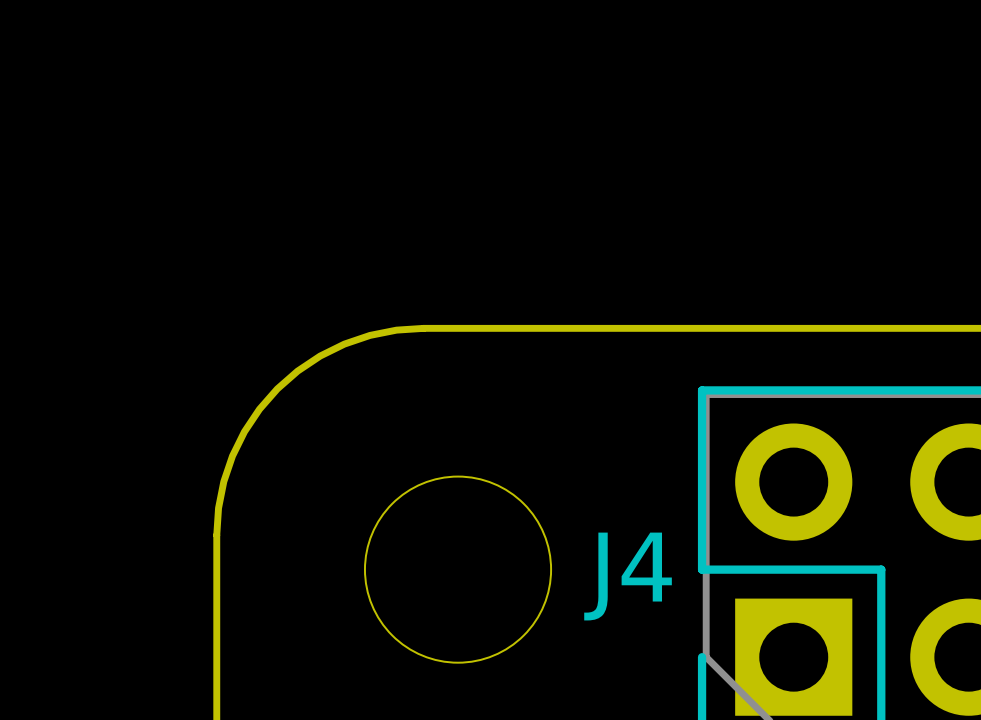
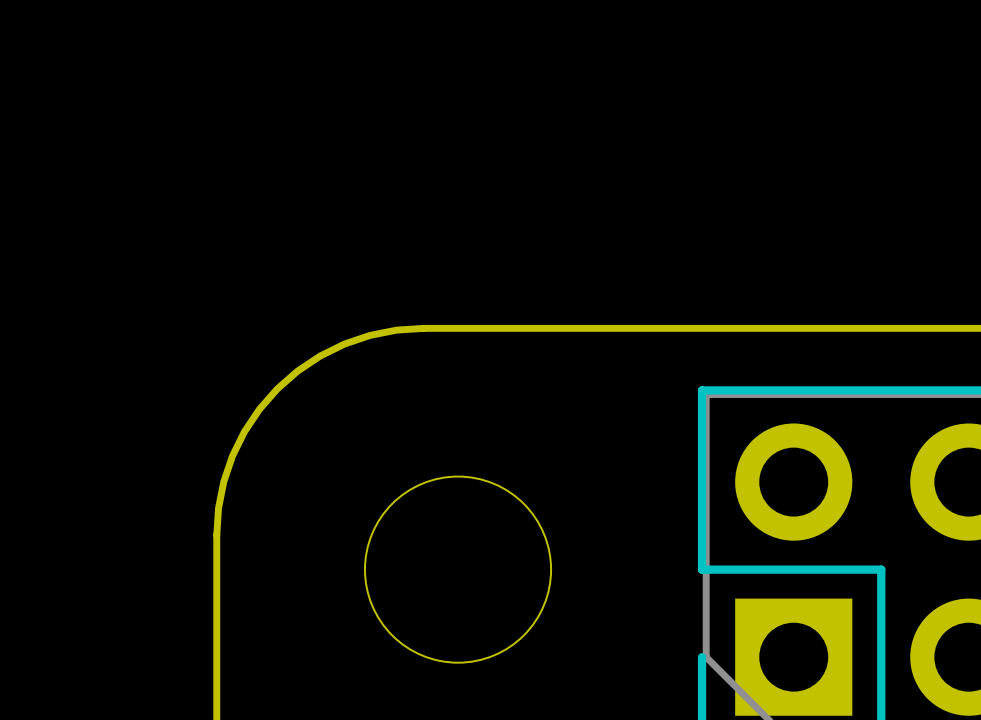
J4 name: J4 (628, 576) -> none

